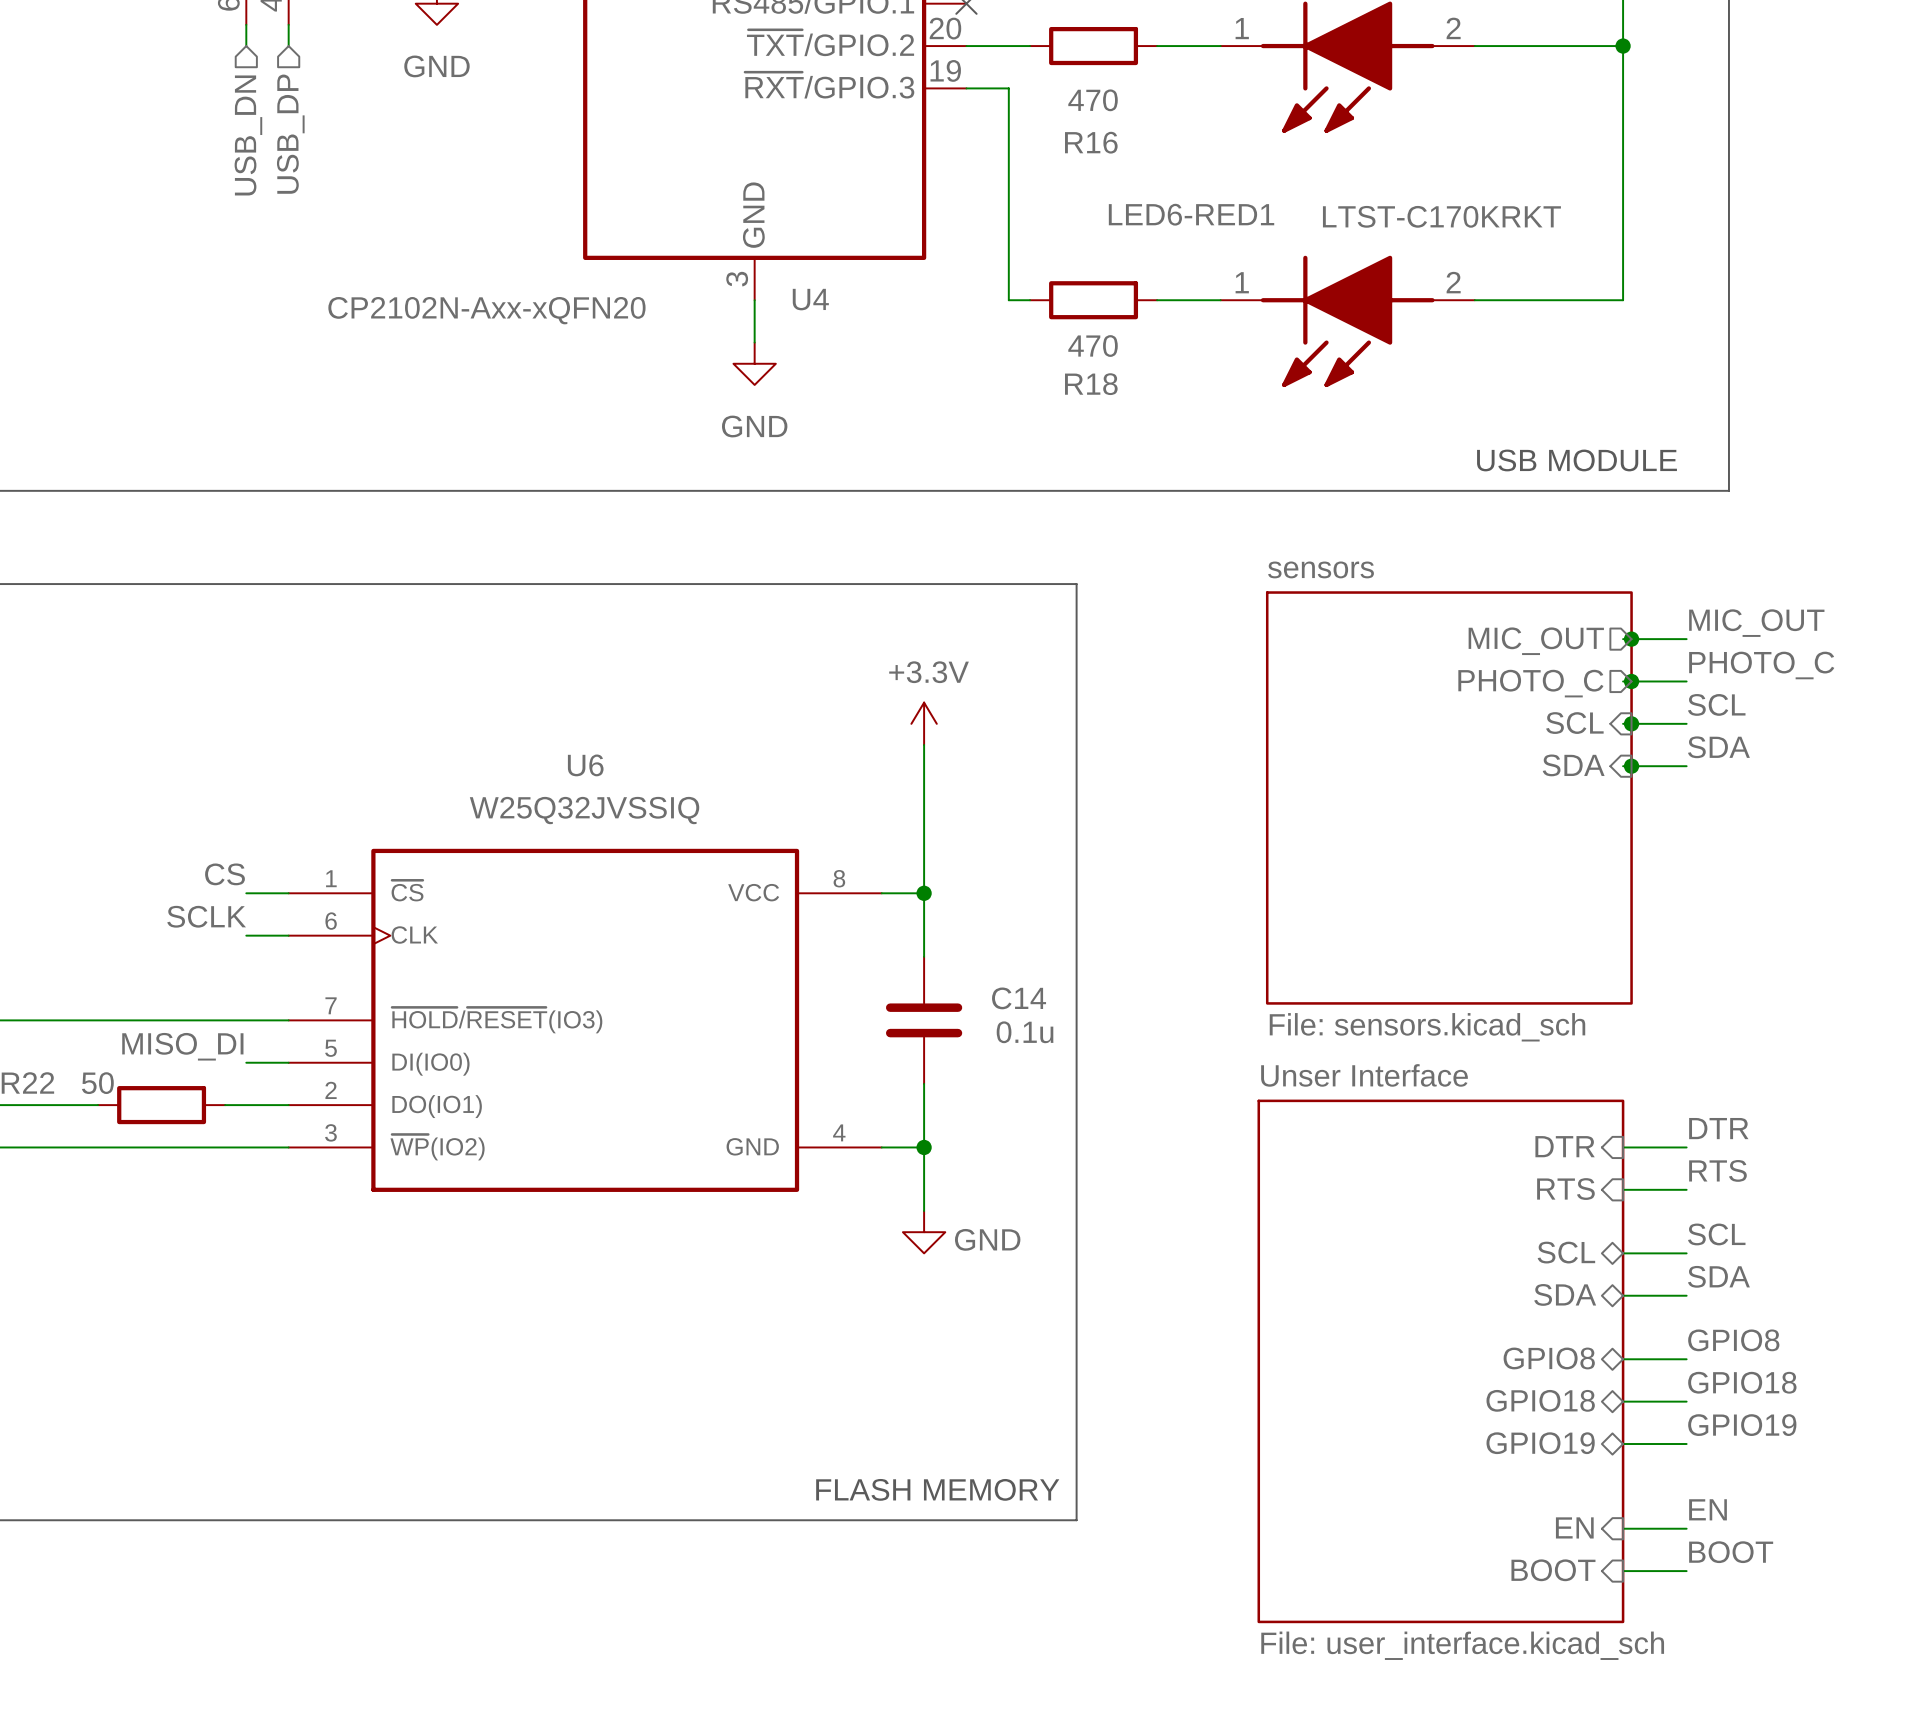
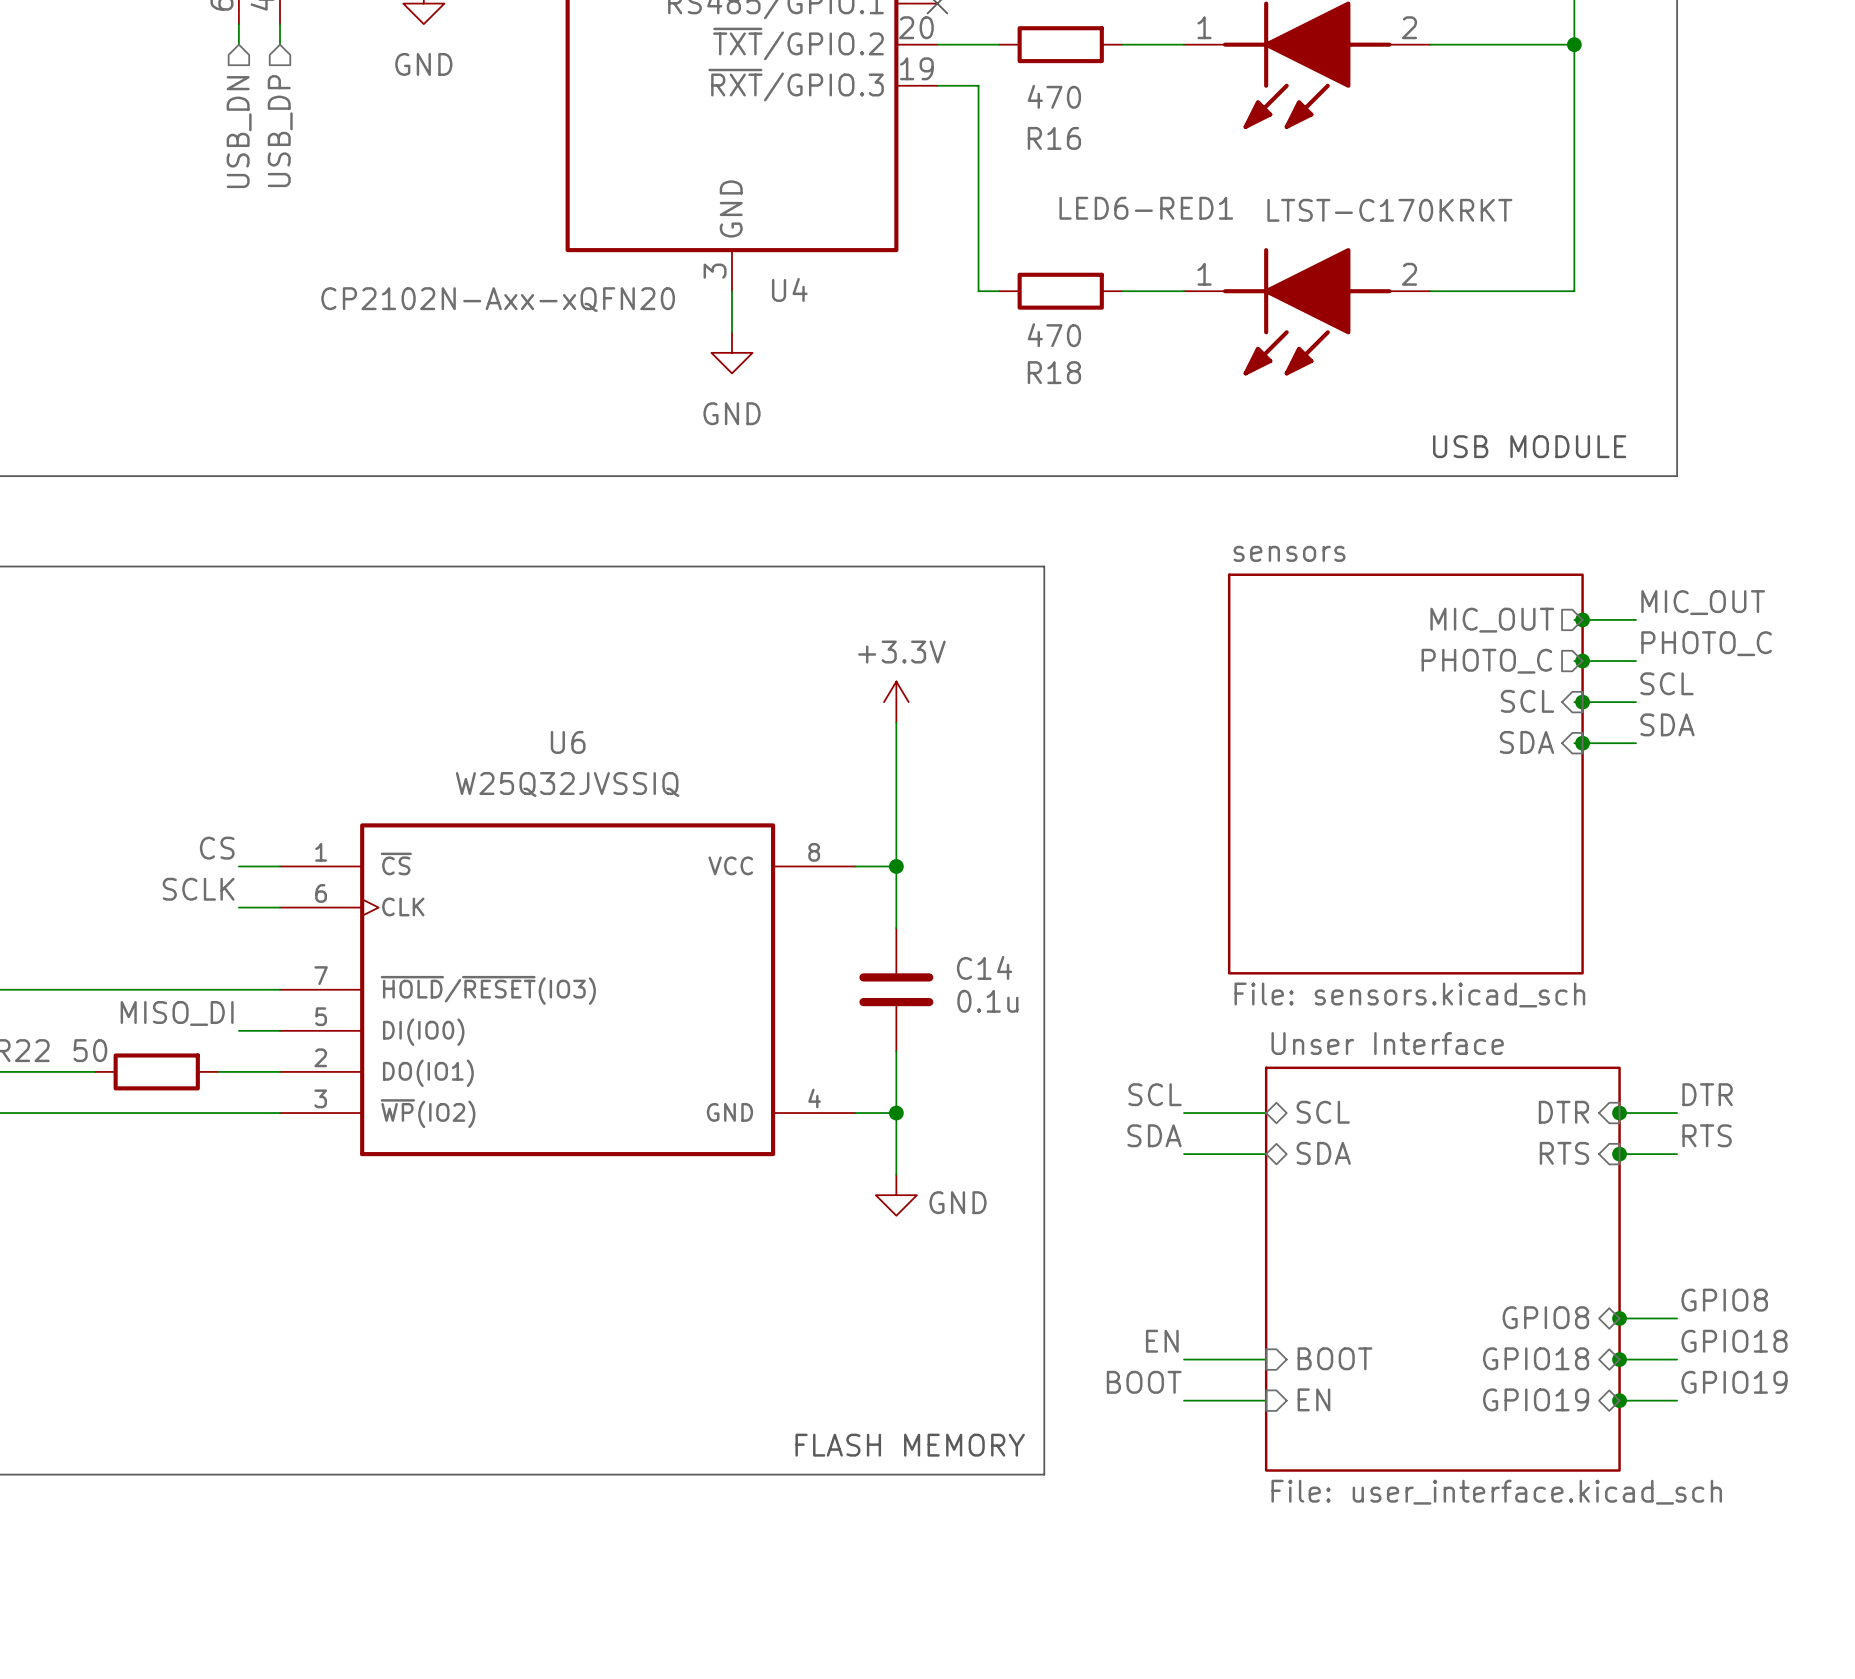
label: none -> SCL (1154, 1094)
label position: DTR (1718, 1128) -> DTR (1707, 1094)
sheet pin position: DTR (1565, 1146) -> DTR (1563, 1112)
wire: none -> (1183, 1113) (1266, 1113)
wire: (1623, 1147) (1665, 1147) -> (1635, 1113) (1677, 1113)
junction: none -> (1619, 1113)
label: none -> SDA (1154, 1135)
label position: RTS (1717, 1170) -> RTS (1707, 1135)
wire: none -> (1183, 1154) (1266, 1154)
sheet pin position: RTS (1565, 1189) -> RTS (1564, 1153)
wire: (1623, 1189) (1665, 1189) -> (1635, 1154) (1677, 1154)
junction: none -> (1619, 1154)
label: SCL (1716, 1234) -> none
sheet pin rotation: 0° (1566, 1252) -> 180° (1323, 1112)
sheet pin position: SCL (1566, 1252) -> SCL (1323, 1112)
wire: (1623, 1253) (1686, 1253) -> none
label: SDA (1718, 1276) -> none
sheet pin rotation: 0° (1565, 1294) -> 180° (1323, 1153)
sheet pin position: SDA (1565, 1294) -> SDA (1323, 1153)
wire: (1623, 1295) (1686, 1295) -> none
sheet Unser Interface: none -> File: user_interface.kicad_sch (1442, 1269)
label position: GPIO8 (1733, 1340) -> GPIO8 (1724, 1300)
sheet pin position: GPIO8 (1549, 1358) -> GPIO8 (1545, 1317)
wire: (1623, 1359) (1665, 1359) -> (1635, 1318) (1677, 1318)
junction: none -> (1619, 1318)
sheet Unser Interface: File: user_interface.kicad_sch (1440, 1361) -> none
label: none -> EN (1162, 1341)
label position: GPIO18 (1742, 1382) -> GPIO18 (1734, 1341)
sheet pin position: GPIO18 (1540, 1400) -> GPIO18 (1536, 1358)
wire: none -> (1183, 1359) (1266, 1359)
wire: (1623, 1401) (1665, 1401) -> (1635, 1359) (1677, 1359)
junction: none -> (1619, 1359)
label: none -> BOOT (1144, 1382)
label position: GPIO19 (1742, 1425) -> GPIO19 (1734, 1382)
sheet pin position: GPIO19 (1540, 1443) -> GPIO19 (1536, 1399)
wire: none -> (1183, 1400) (1266, 1400)
wire: (1623, 1444) (1665, 1444) -> (1635, 1400) (1677, 1400)
junction: none -> (1619, 1400)
label: EN (1708, 1509) -> none
sheet pin rotation: 0° (1574, 1527) -> 180° (1313, 1399)
sheet pin position: EN (1574, 1527) -> EN (1313, 1399)
wire: (1623, 1528) (1686, 1528) -> none
label: BOOT (1731, 1552) -> none
sheet pin rotation: 0° (1553, 1570) -> 180° (1334, 1358)
sheet pin position: BOOT (1553, 1570) -> BOOT (1334, 1358)
wire: (1623, 1571) (1686, 1571) -> none

